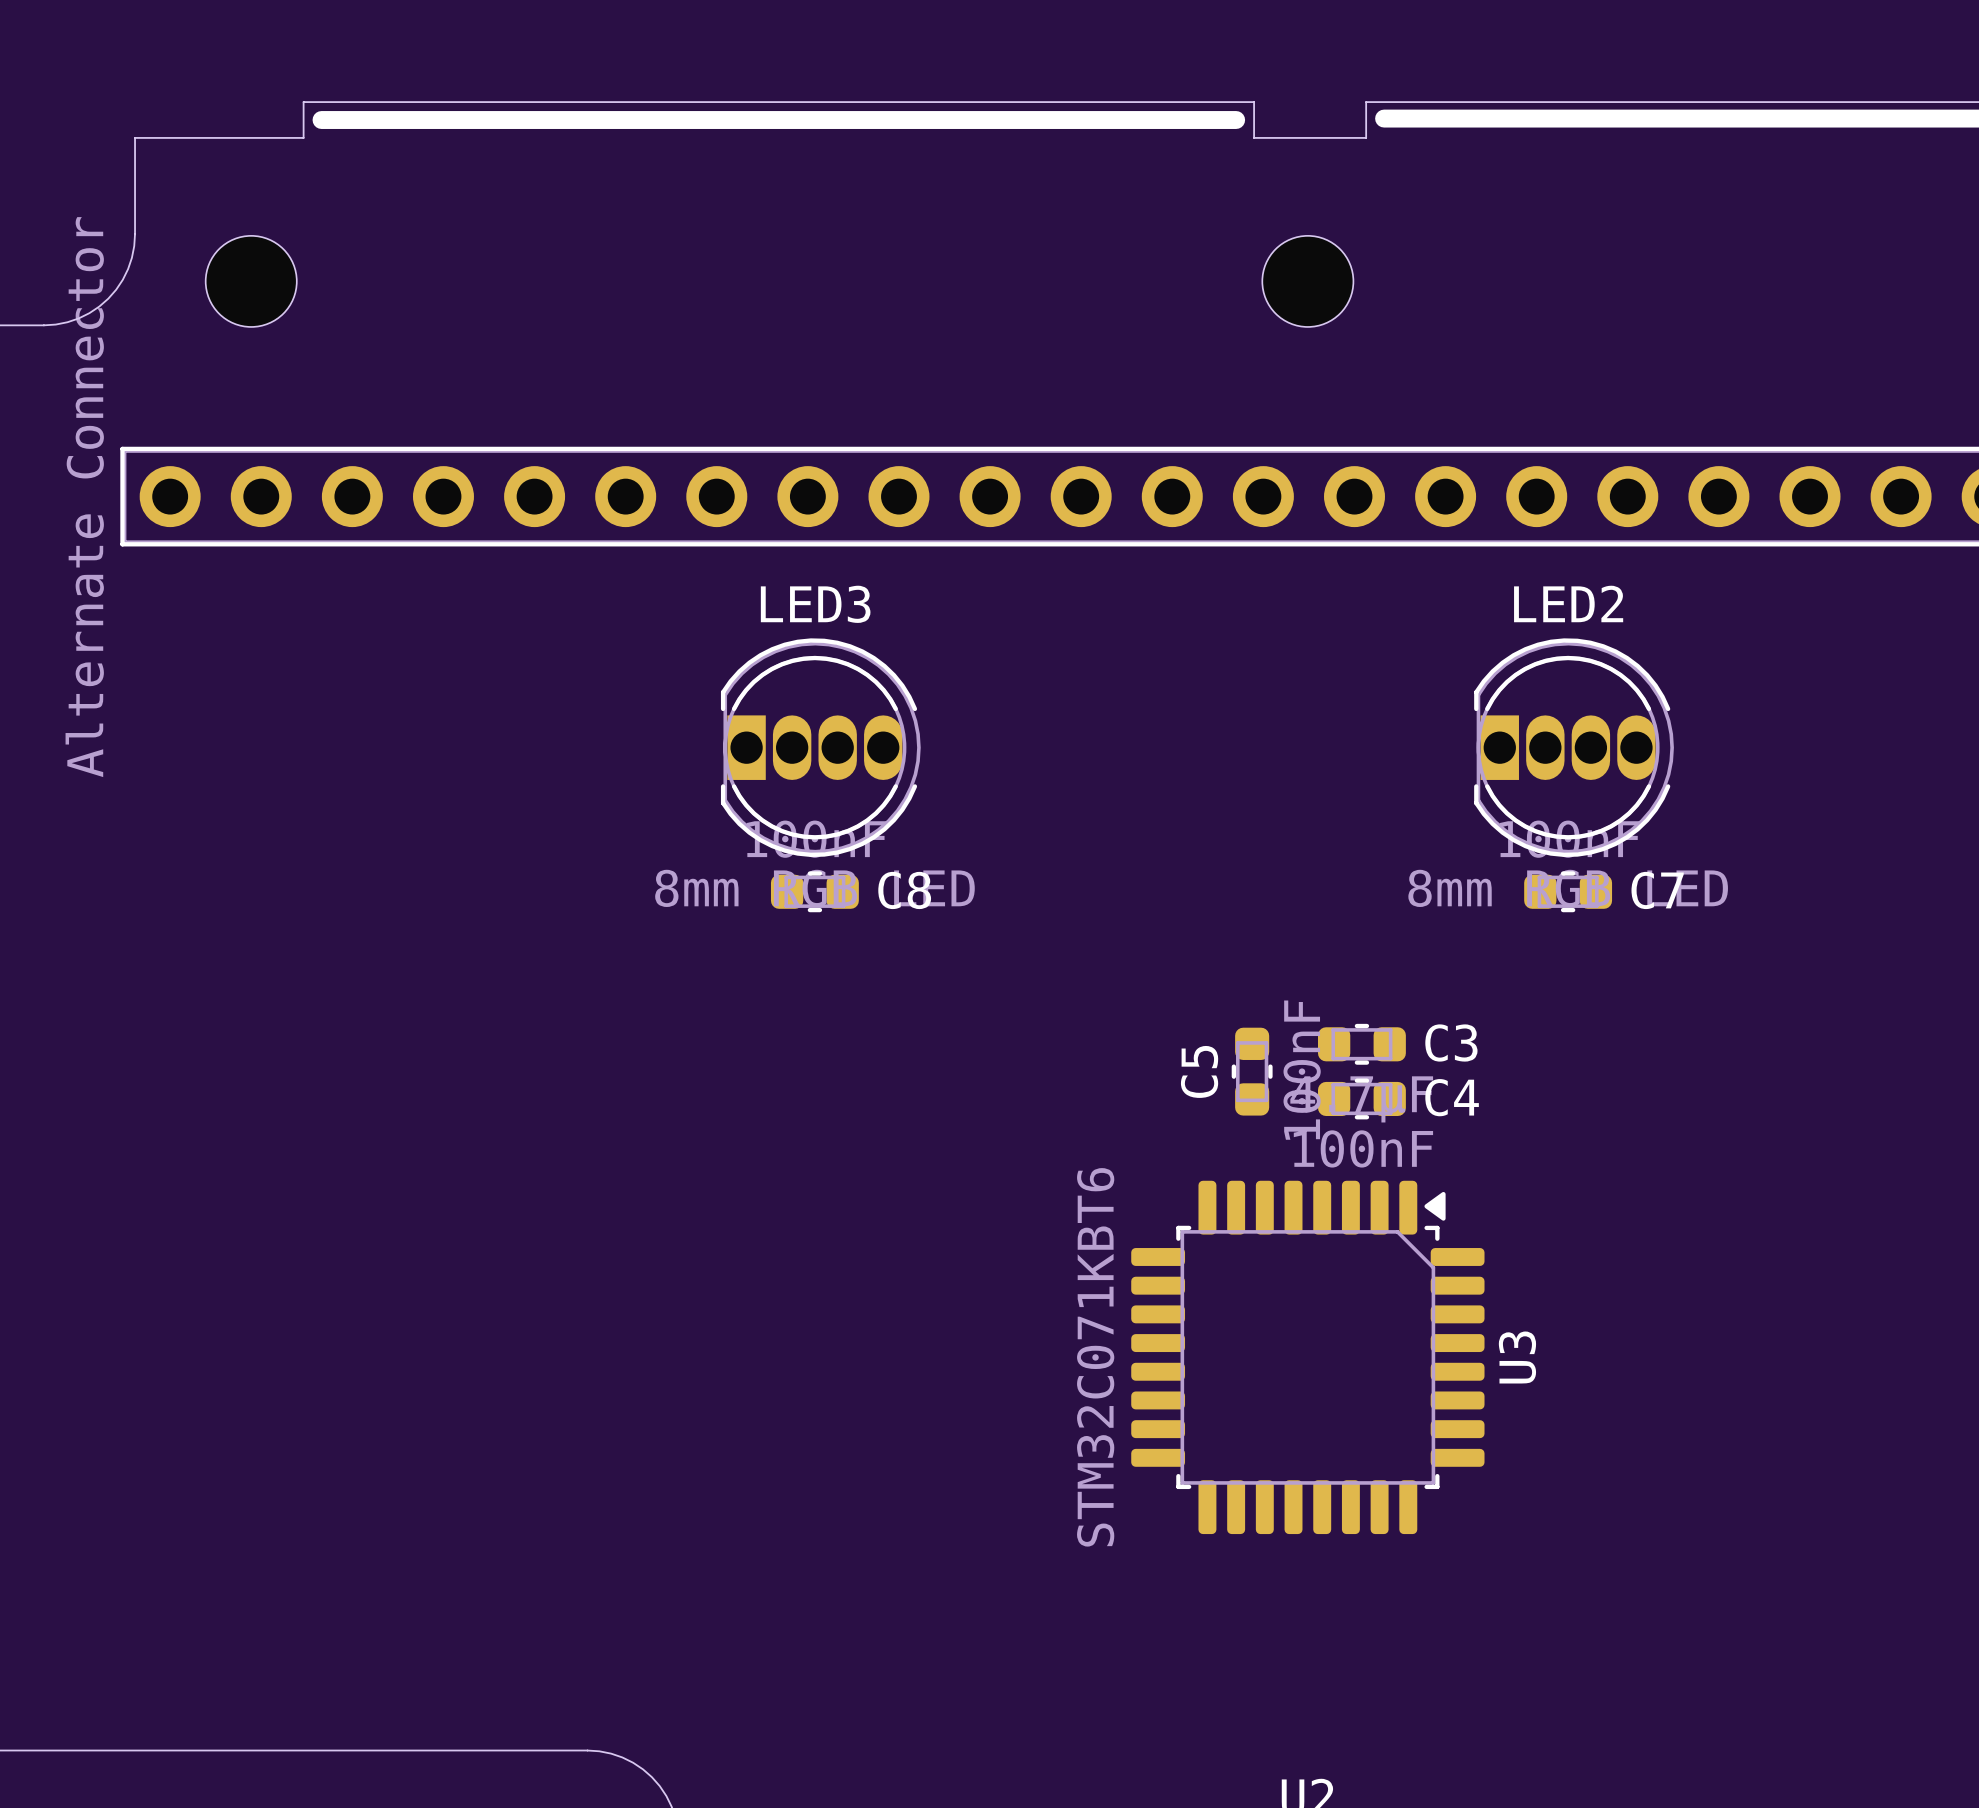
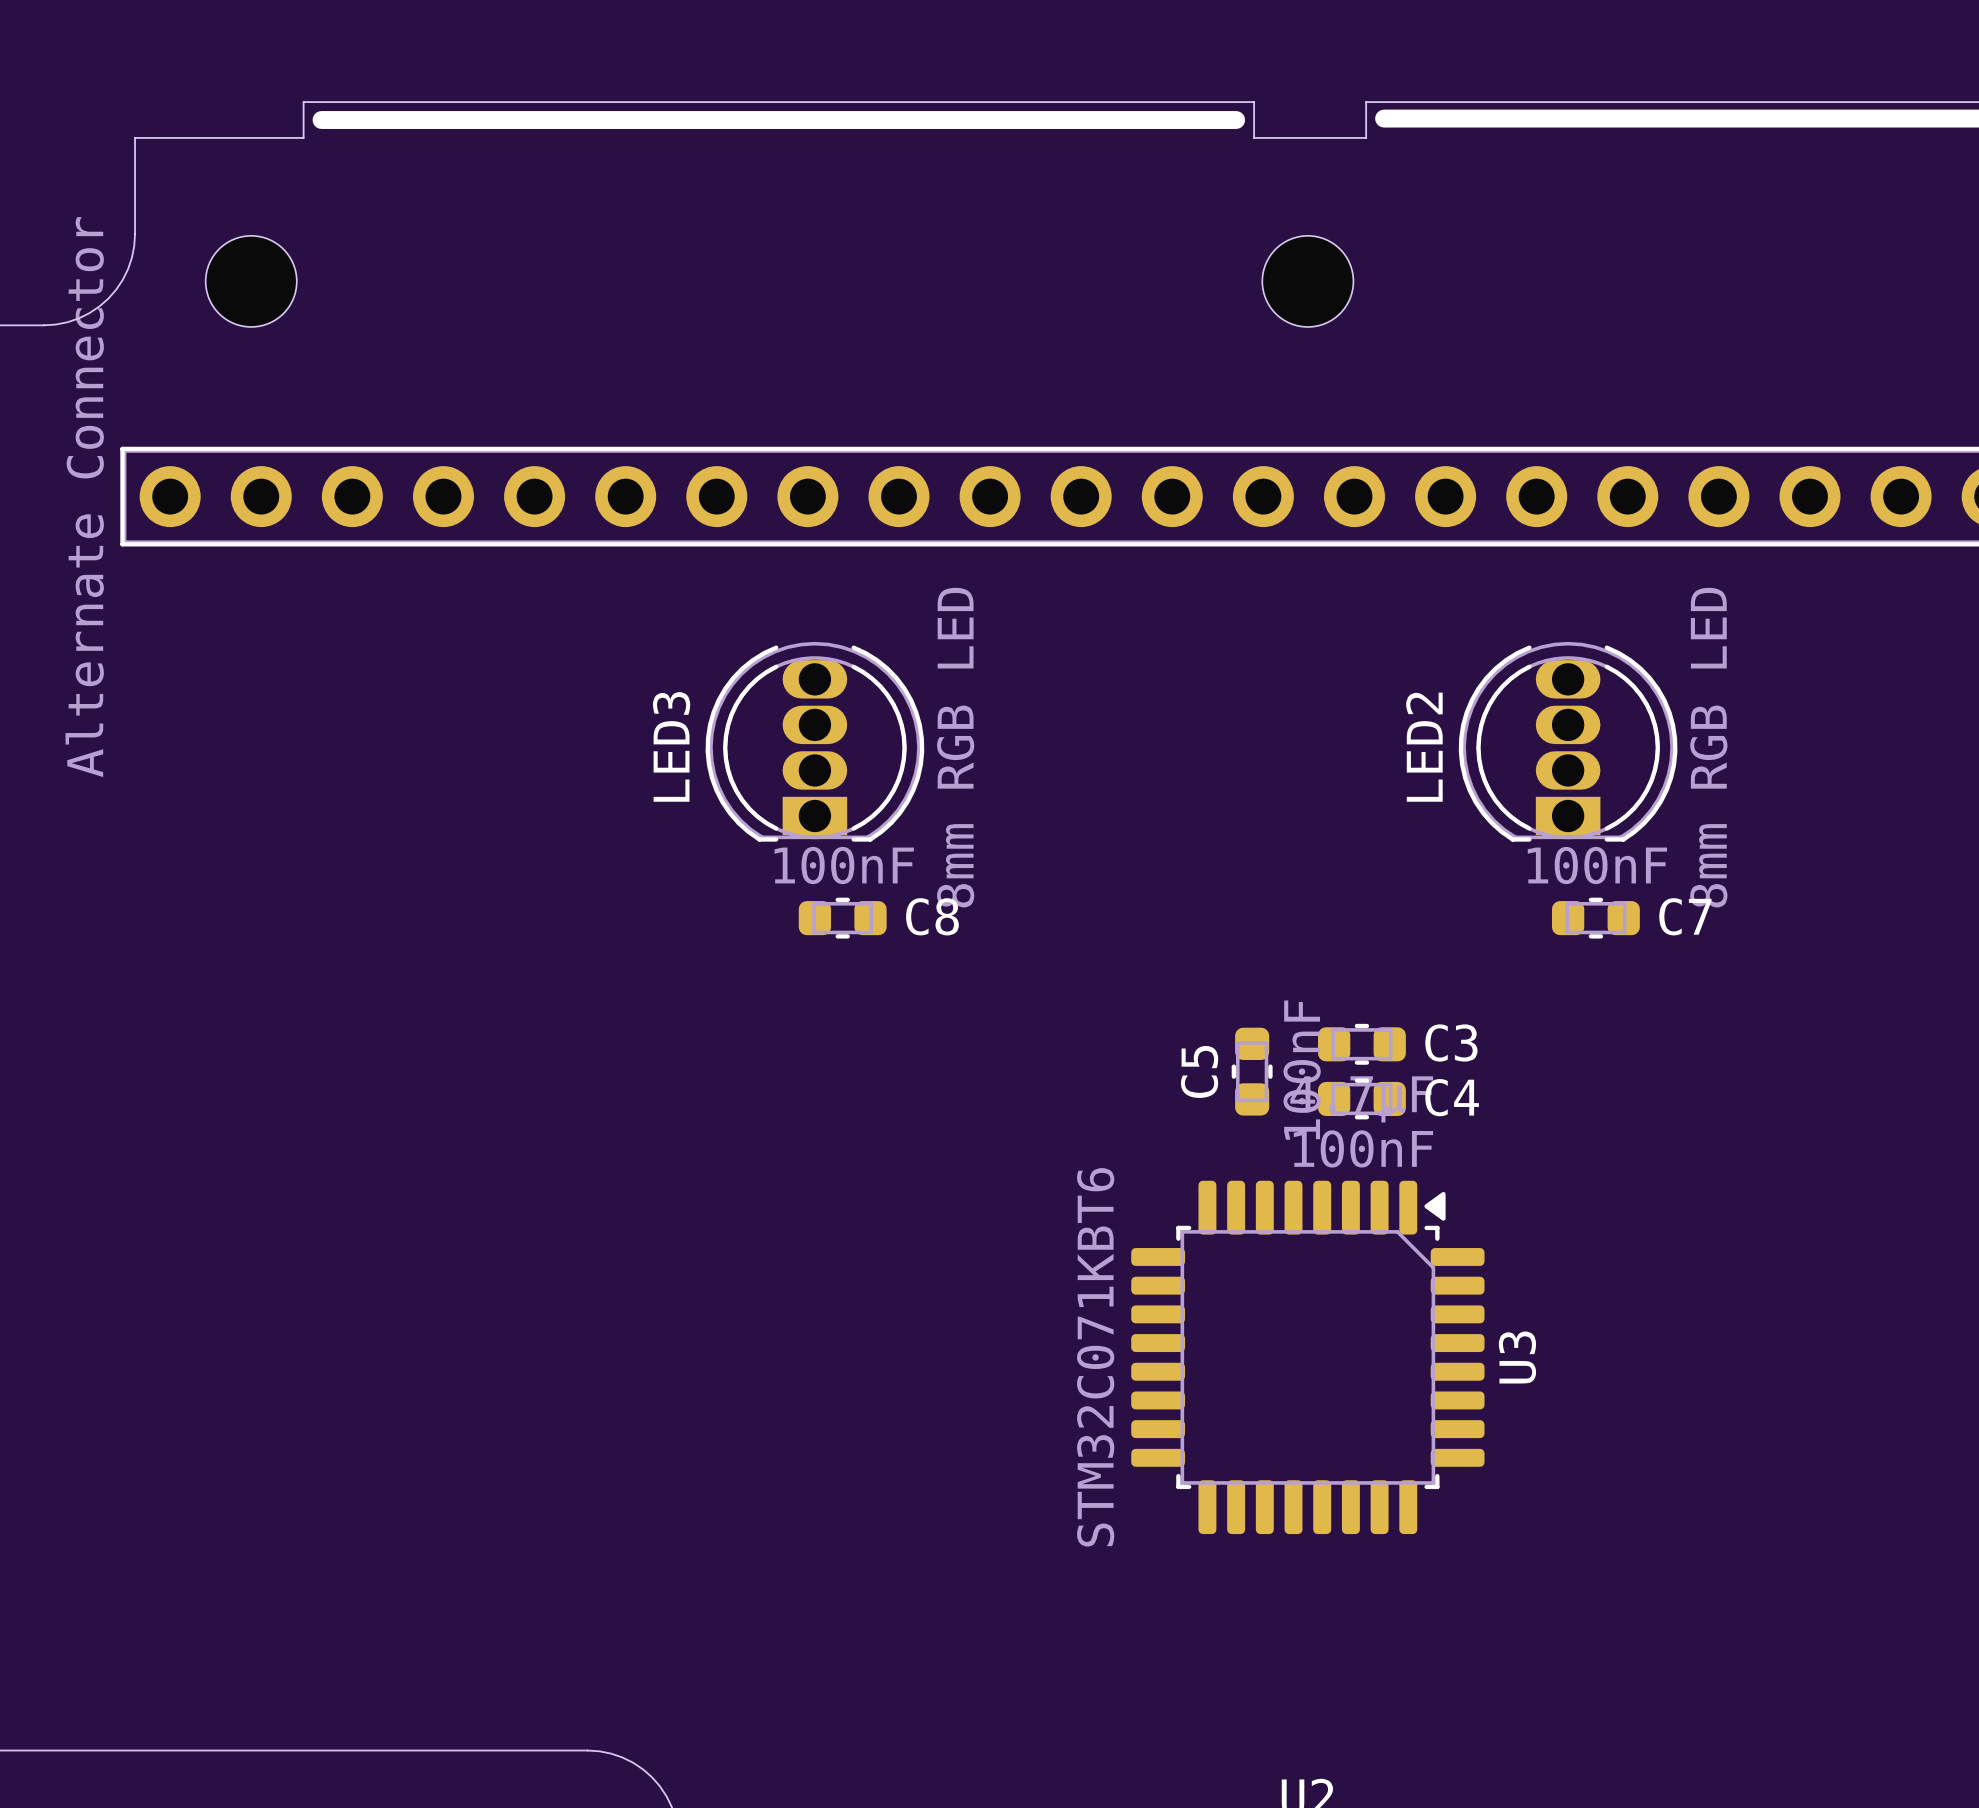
LED3 rotation: 0° (820, 747) -> 90° counterclockwise (814, 741)
LED2 rotation: 0° (1574, 747) -> 90° counterclockwise (1568, 741)
C8 position: (814, 891) -> (842, 918)
C7 position: (1568, 891) -> (1595, 918)

